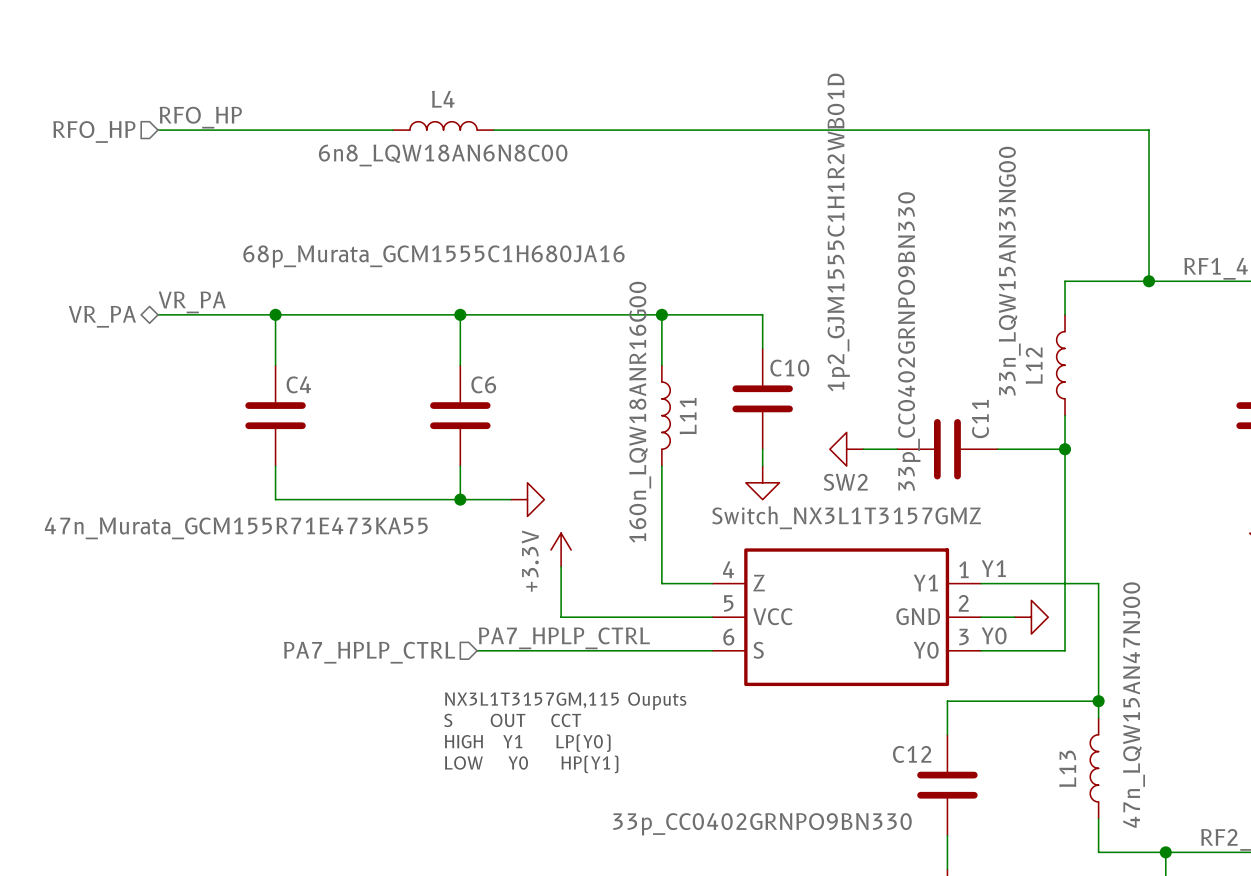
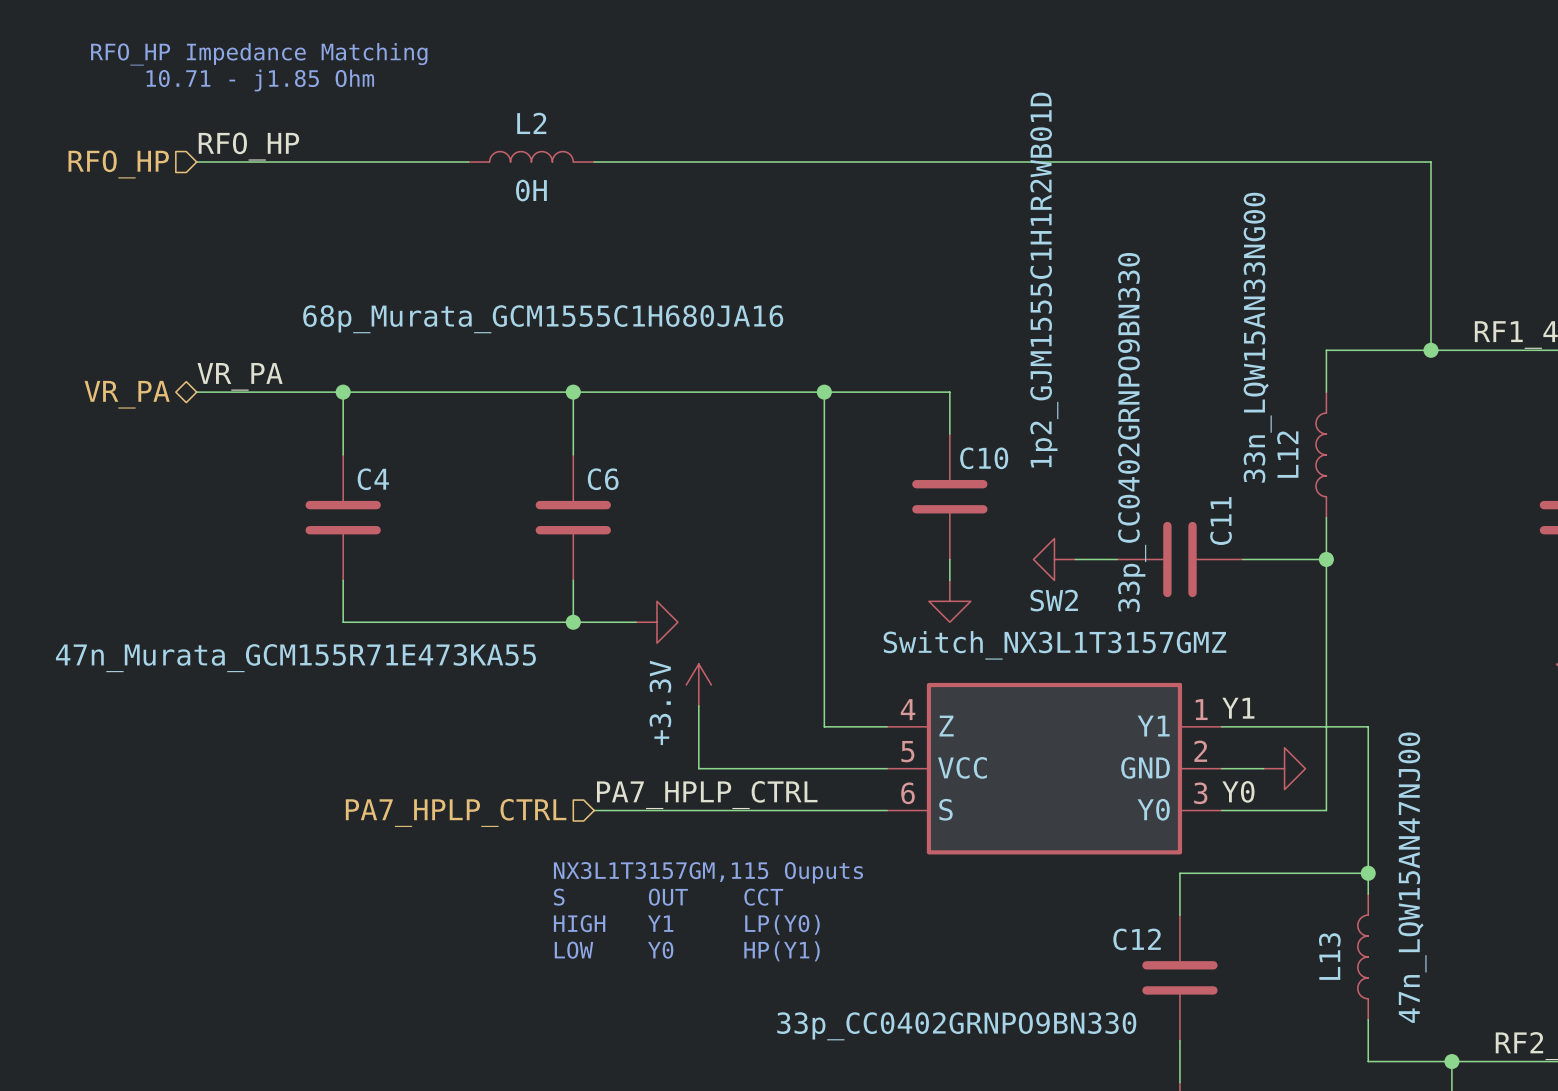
text: none -> RFO_HP Impedance Matching (259, 54)
text: none -> 10.71 - j1.85 Ohm (260, 80)
L2: none -> 0H (531, 156)
L4: 6n8_LQW18AN6N8C00 (443, 125) -> none
wire: none -> (824, 454) (824, 580)
L11: 160n_LQW18ANR16G00 (666, 415) -> none

